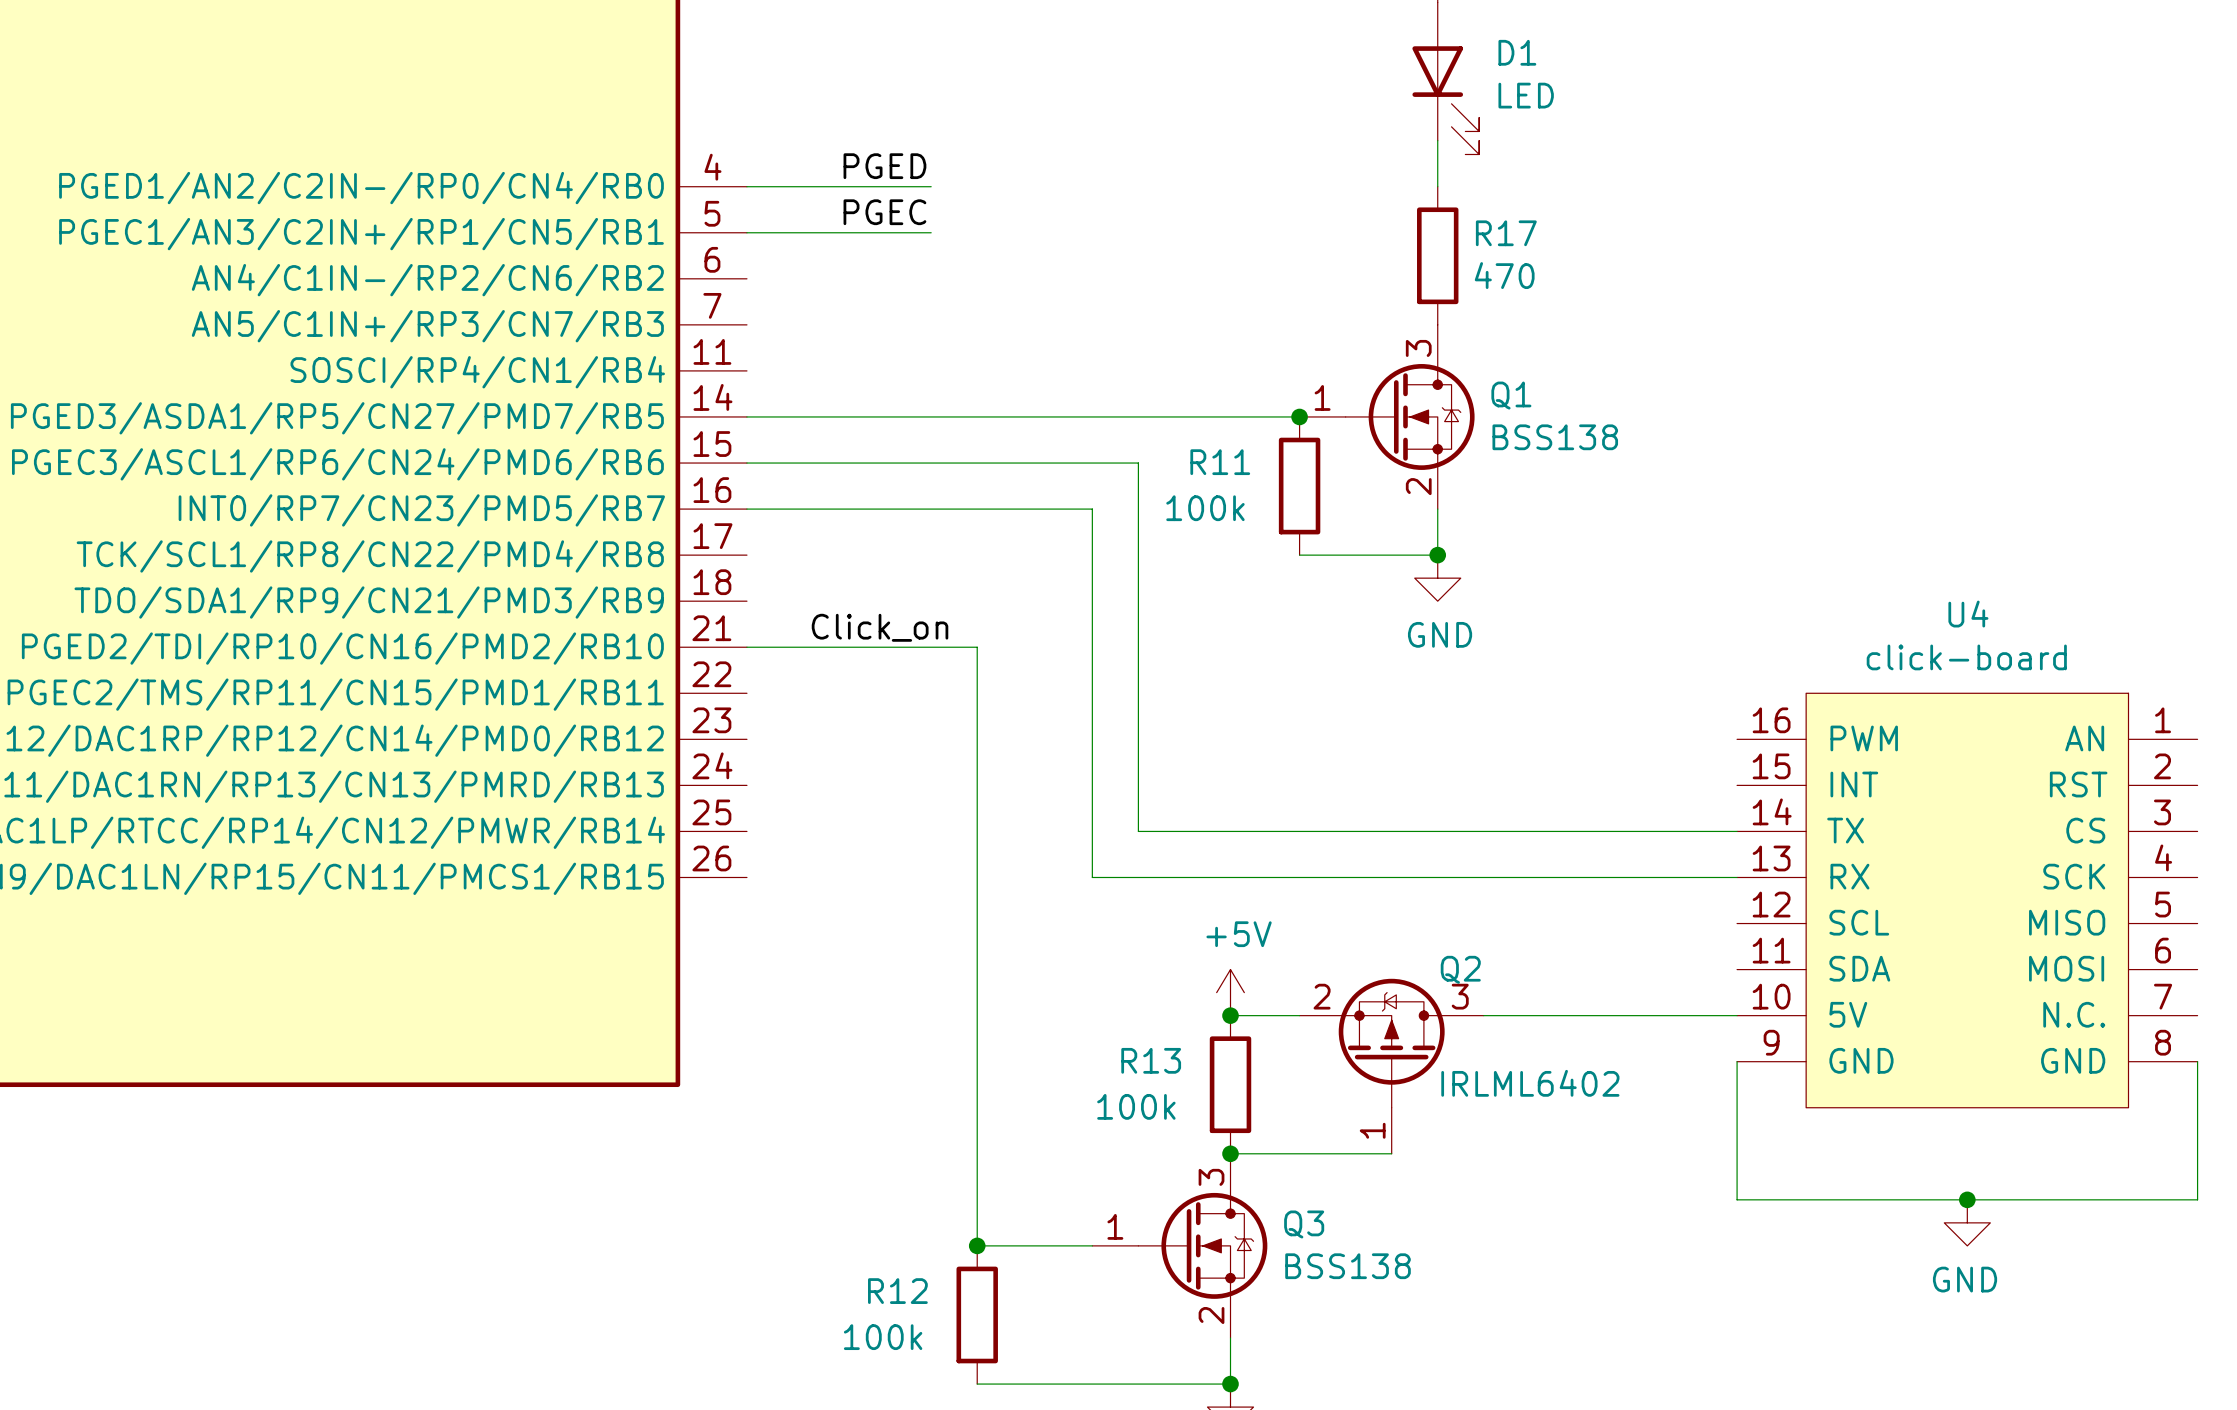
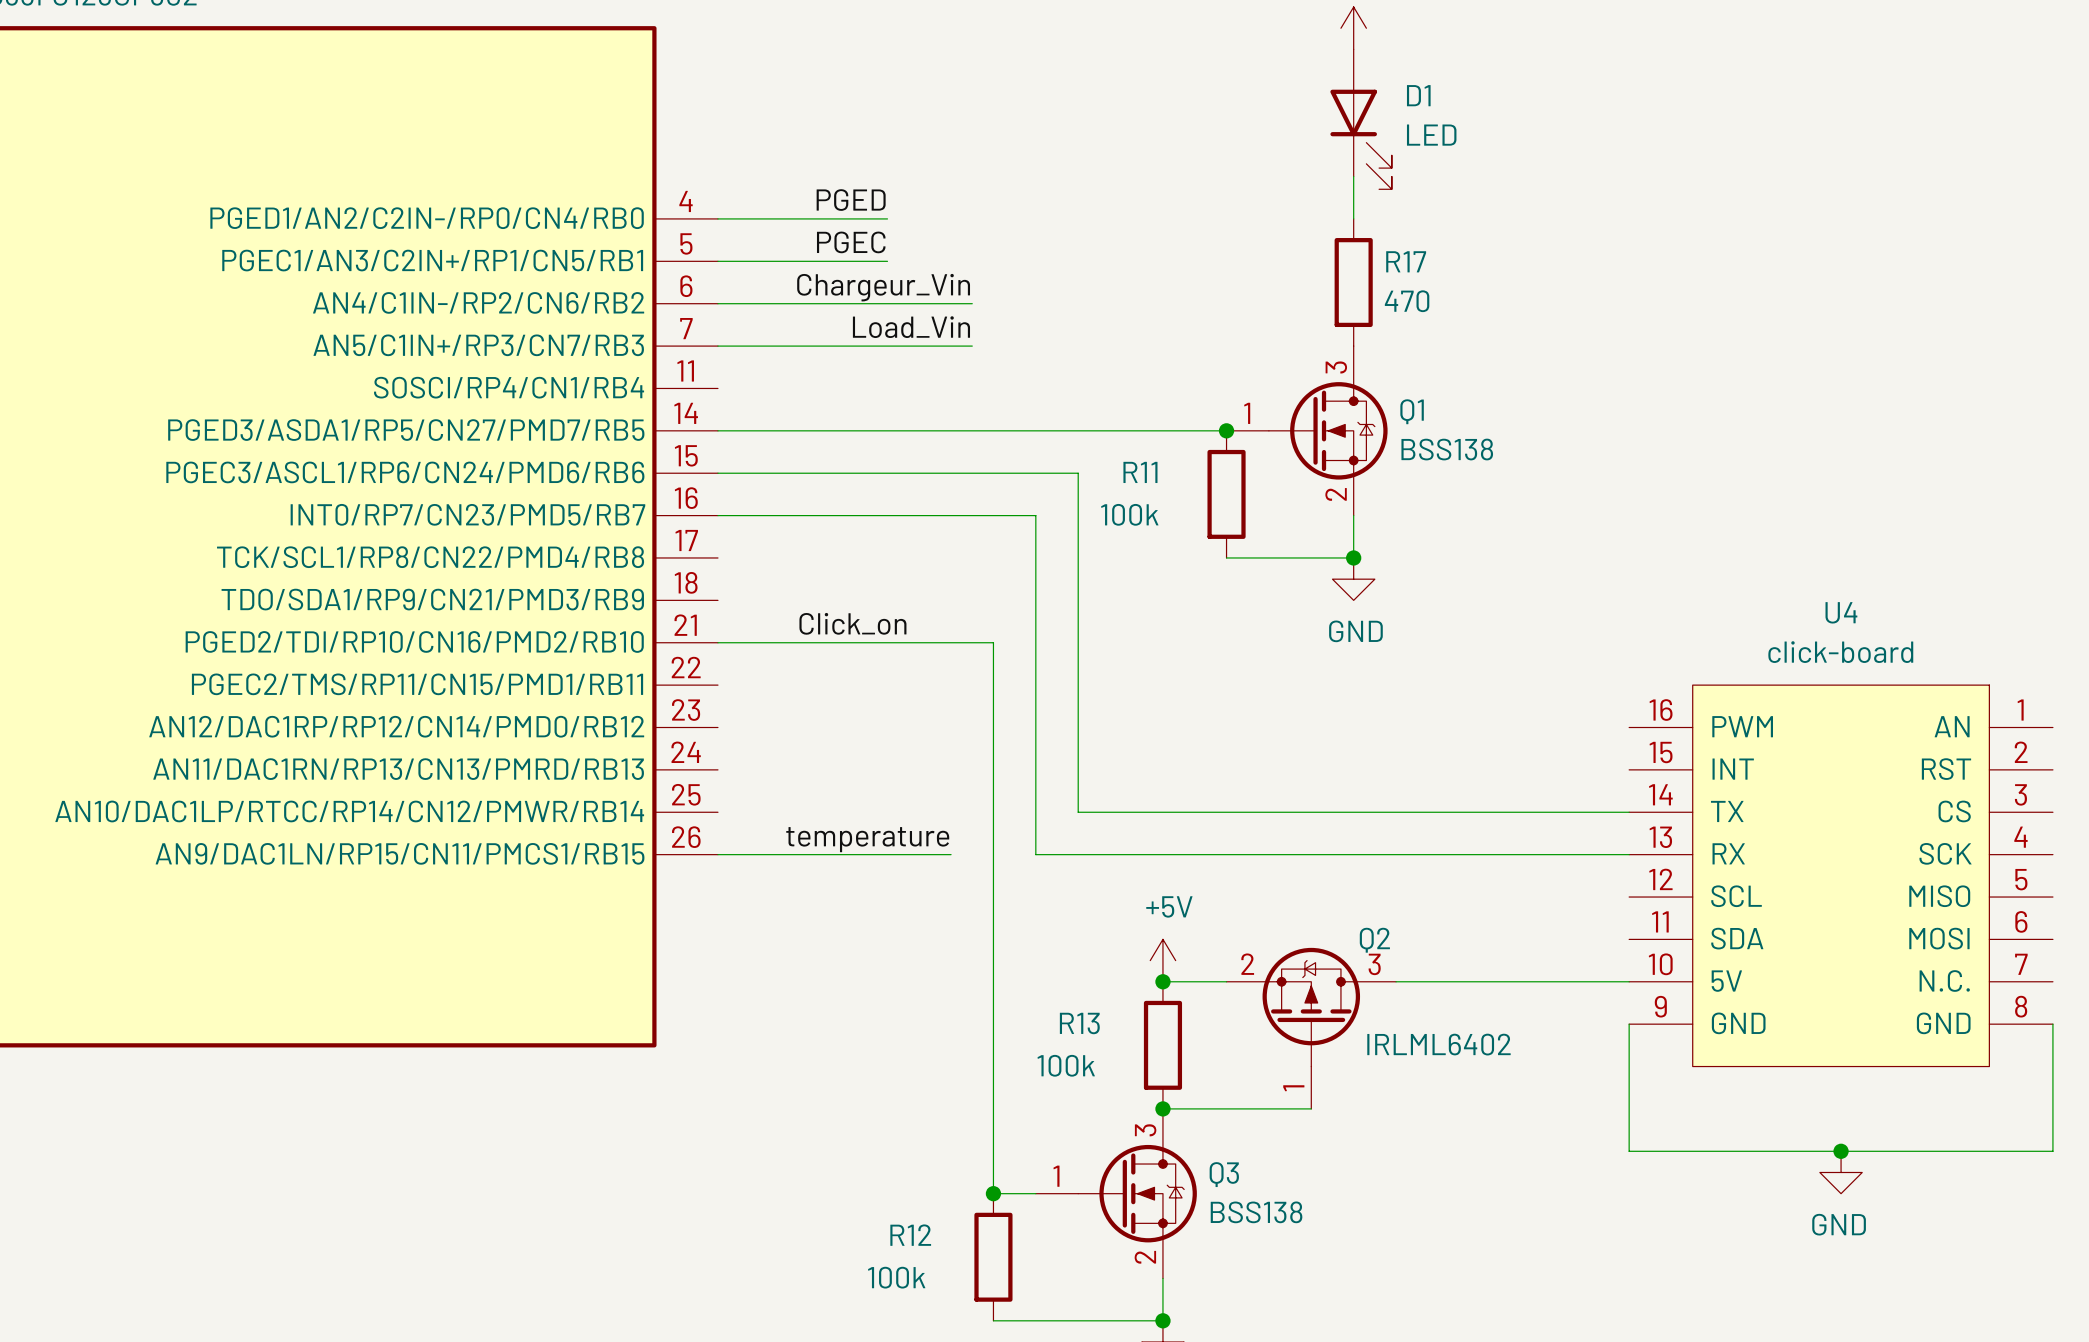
label: none -> Chargeur_Vin (883, 287)
wire: none -> (717, 303) (972, 303)
label: none -> Load_Vin (911, 327)
wire: none -> (717, 346) (972, 346)
wire: (977, 647) (977, 1245) (1046, 1245) -> (929, 642) (993, 642) (993, 1193)
label: none -> temperature (867, 839)
wire: none -> (717, 854) (951, 854)
junction position: (977, 1245) -> (993, 1193)
R12 position: (977, 1314) -> (993, 1257)
wire: (977, 1384) (1046, 1384) -> none

